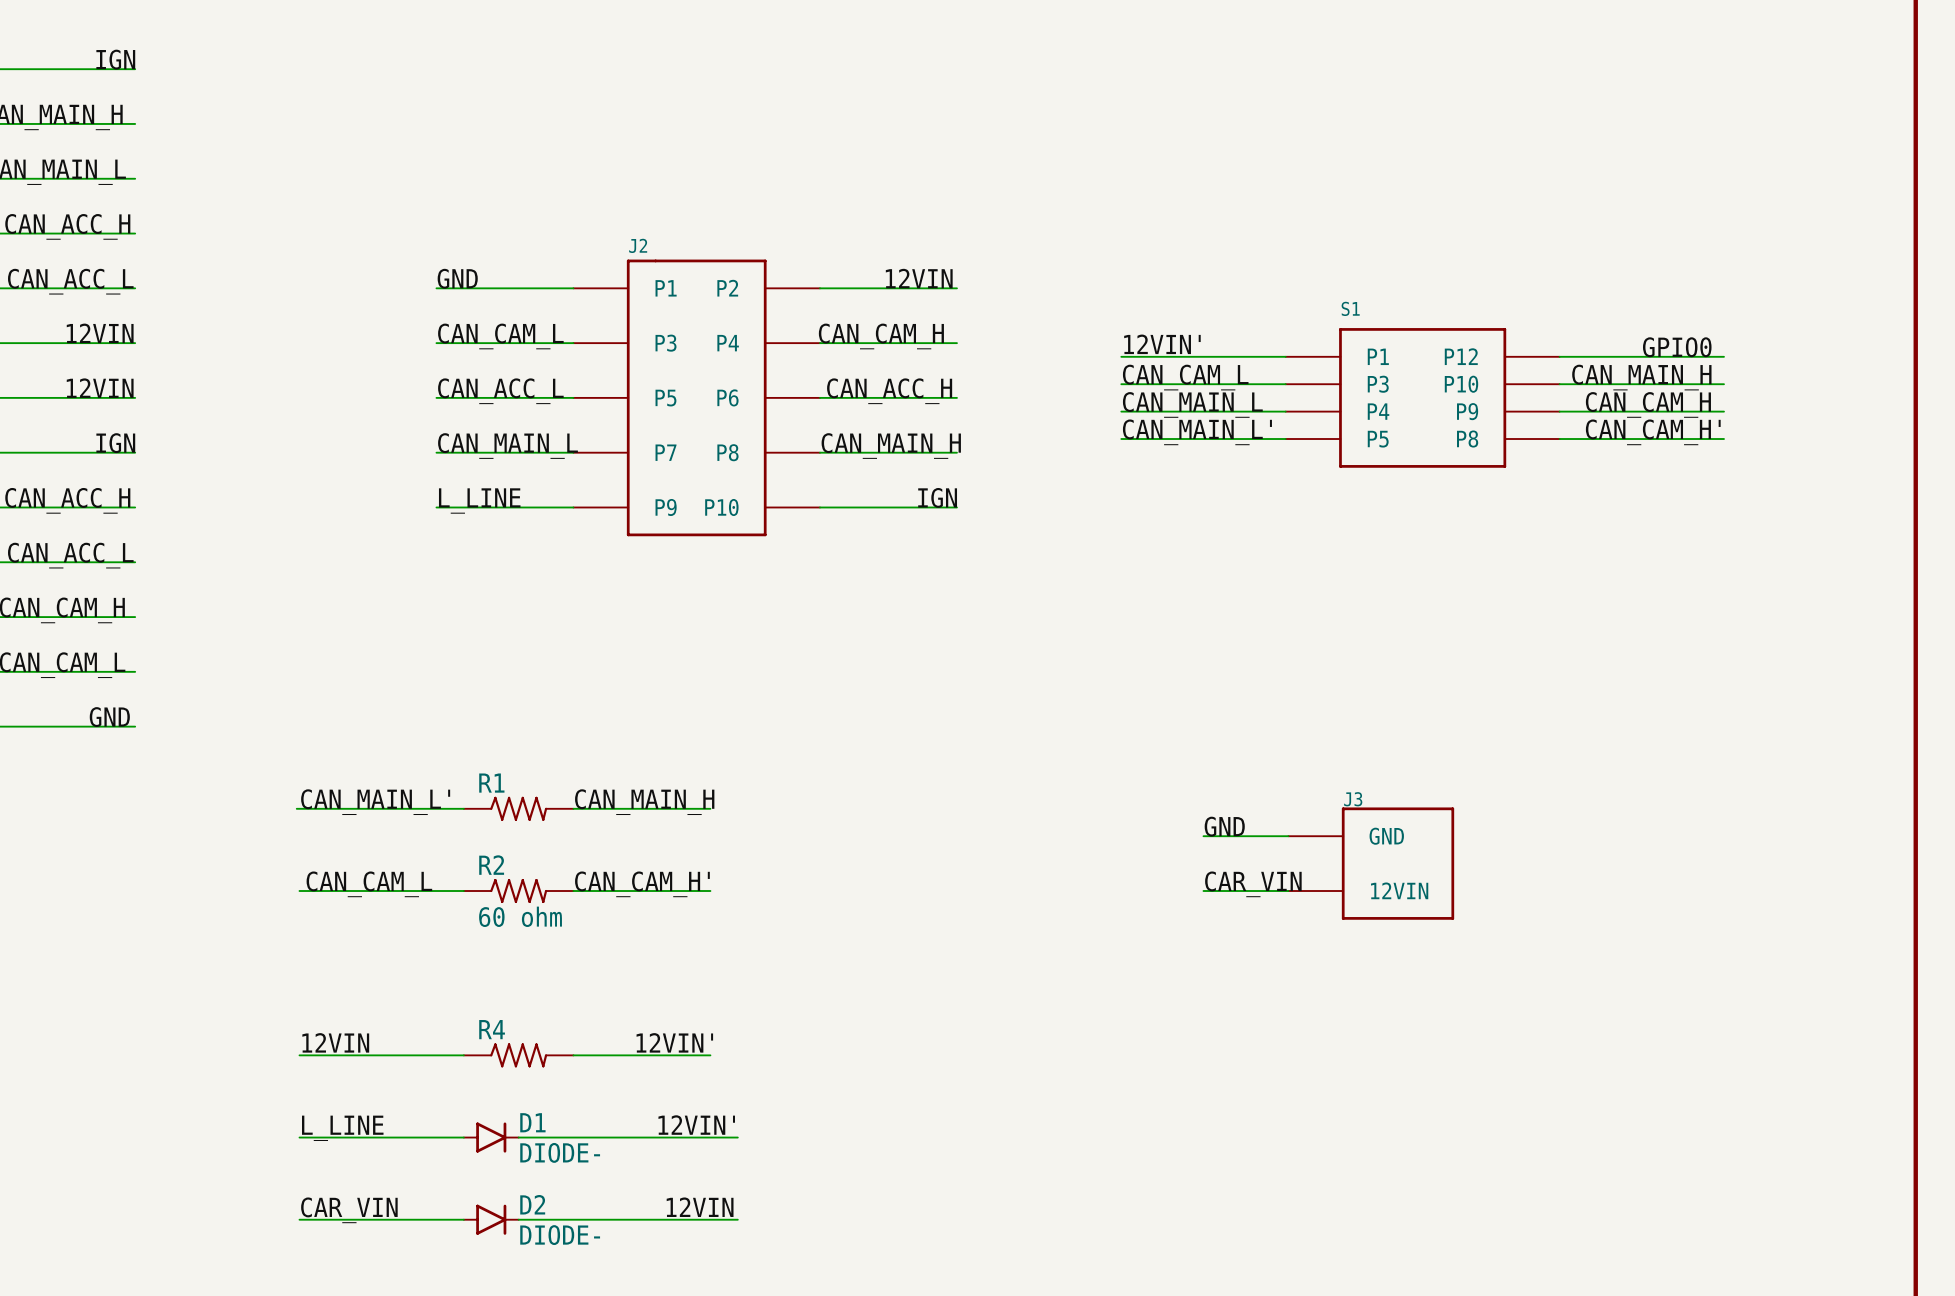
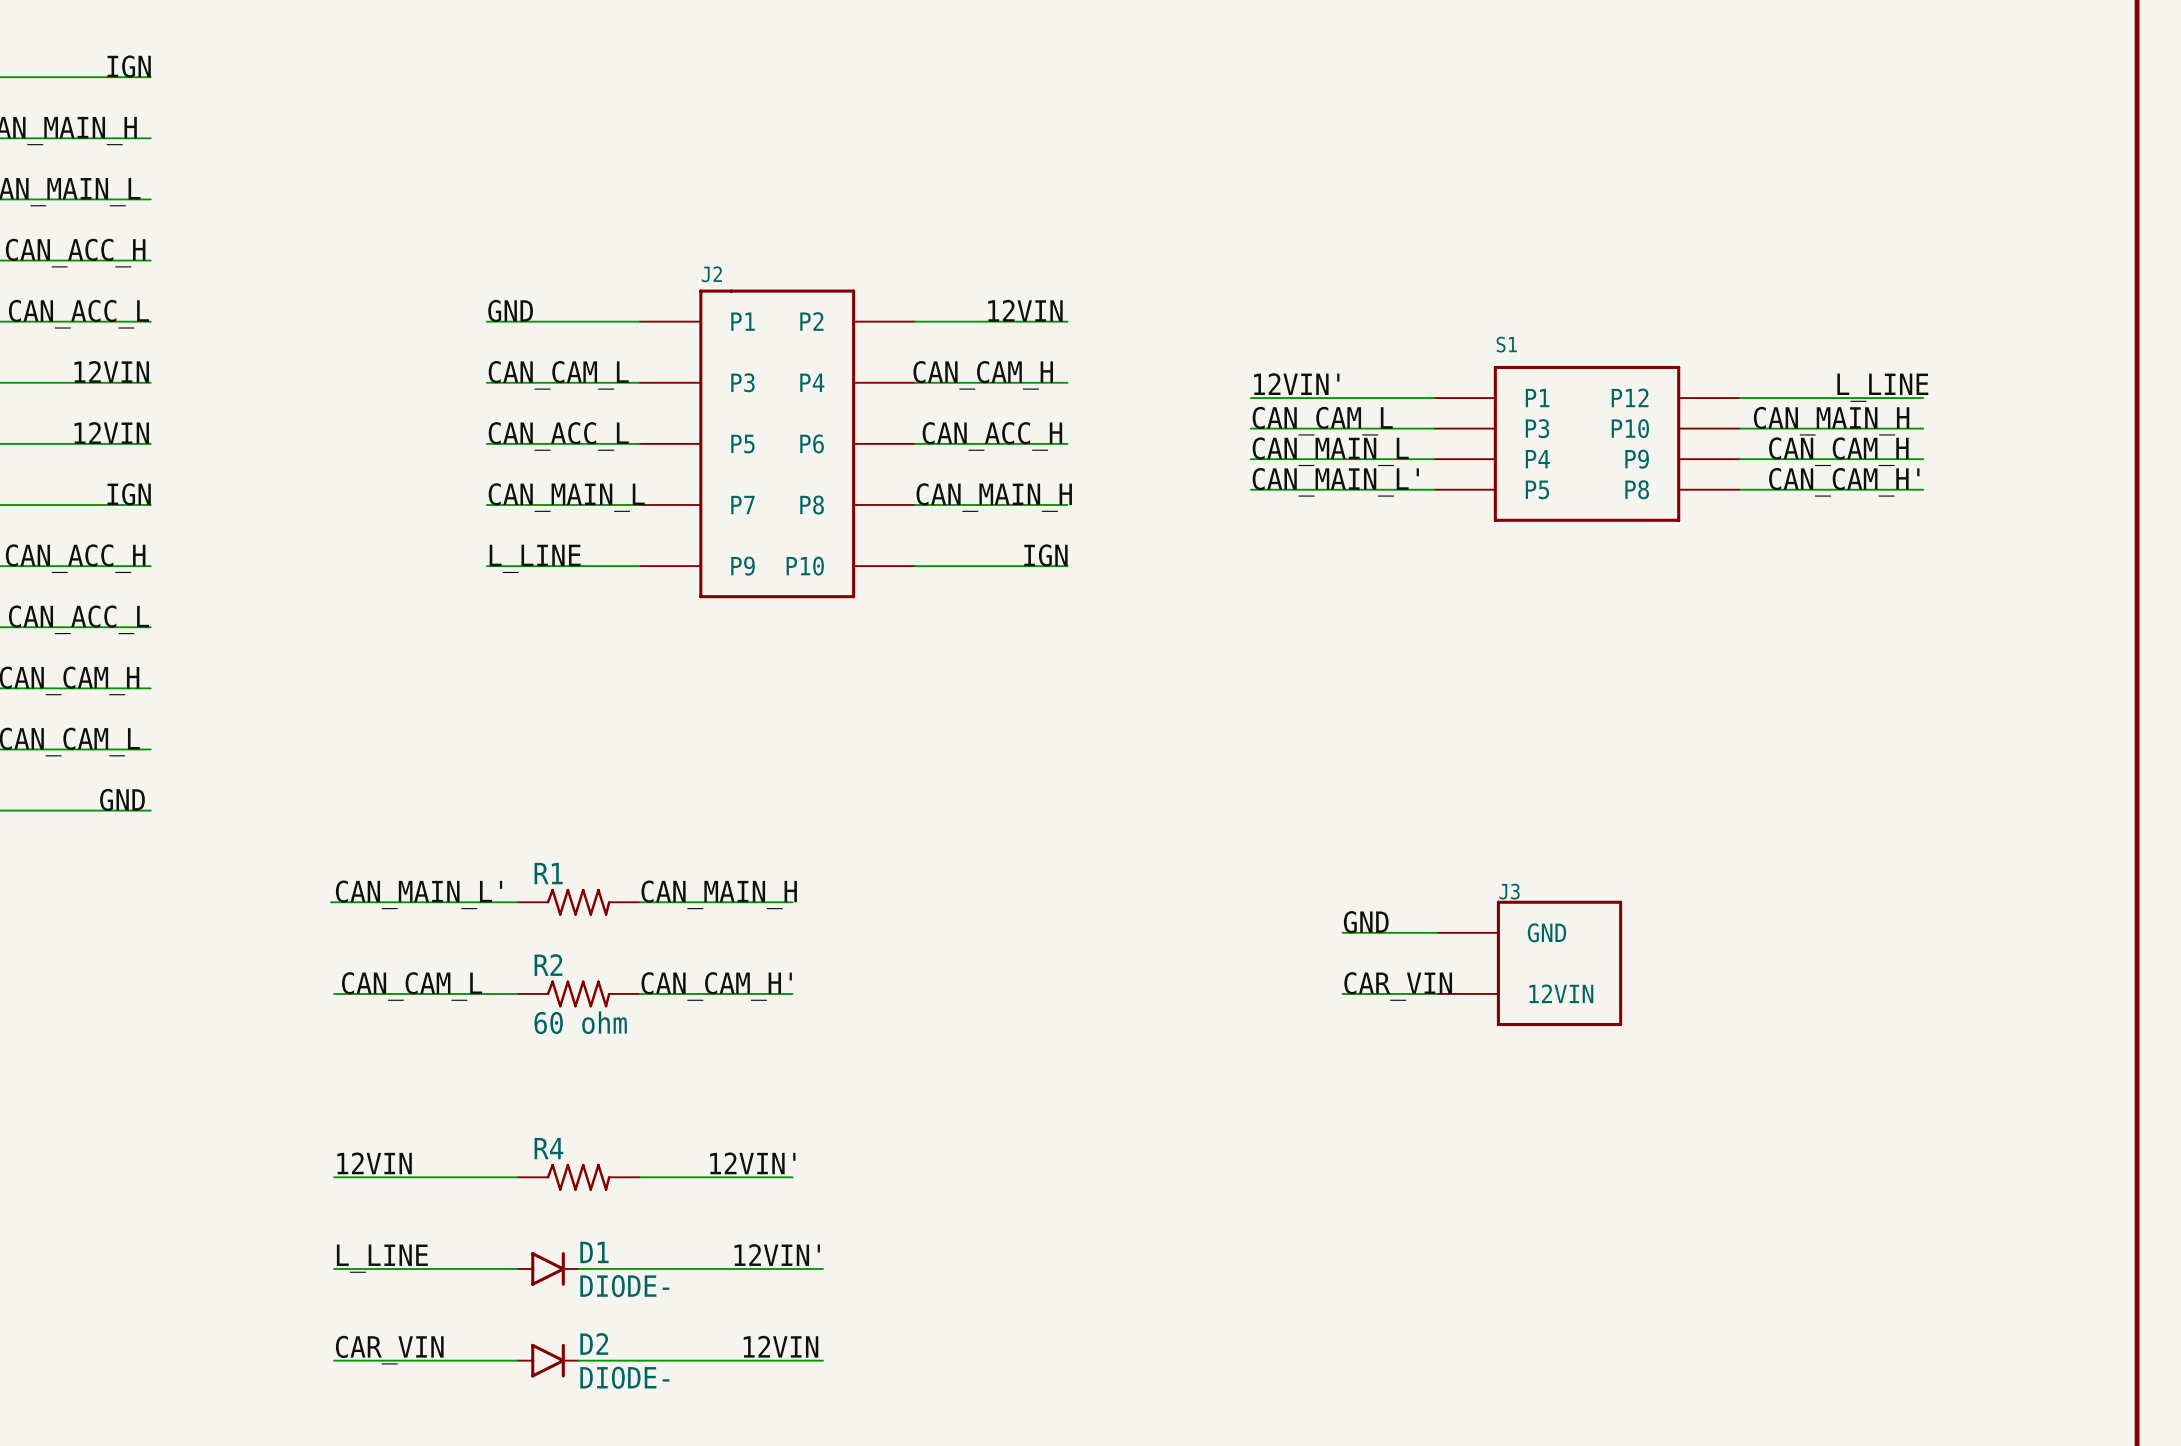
label: GPIO0 (1677, 347) -> L_LINE (1882, 387)

